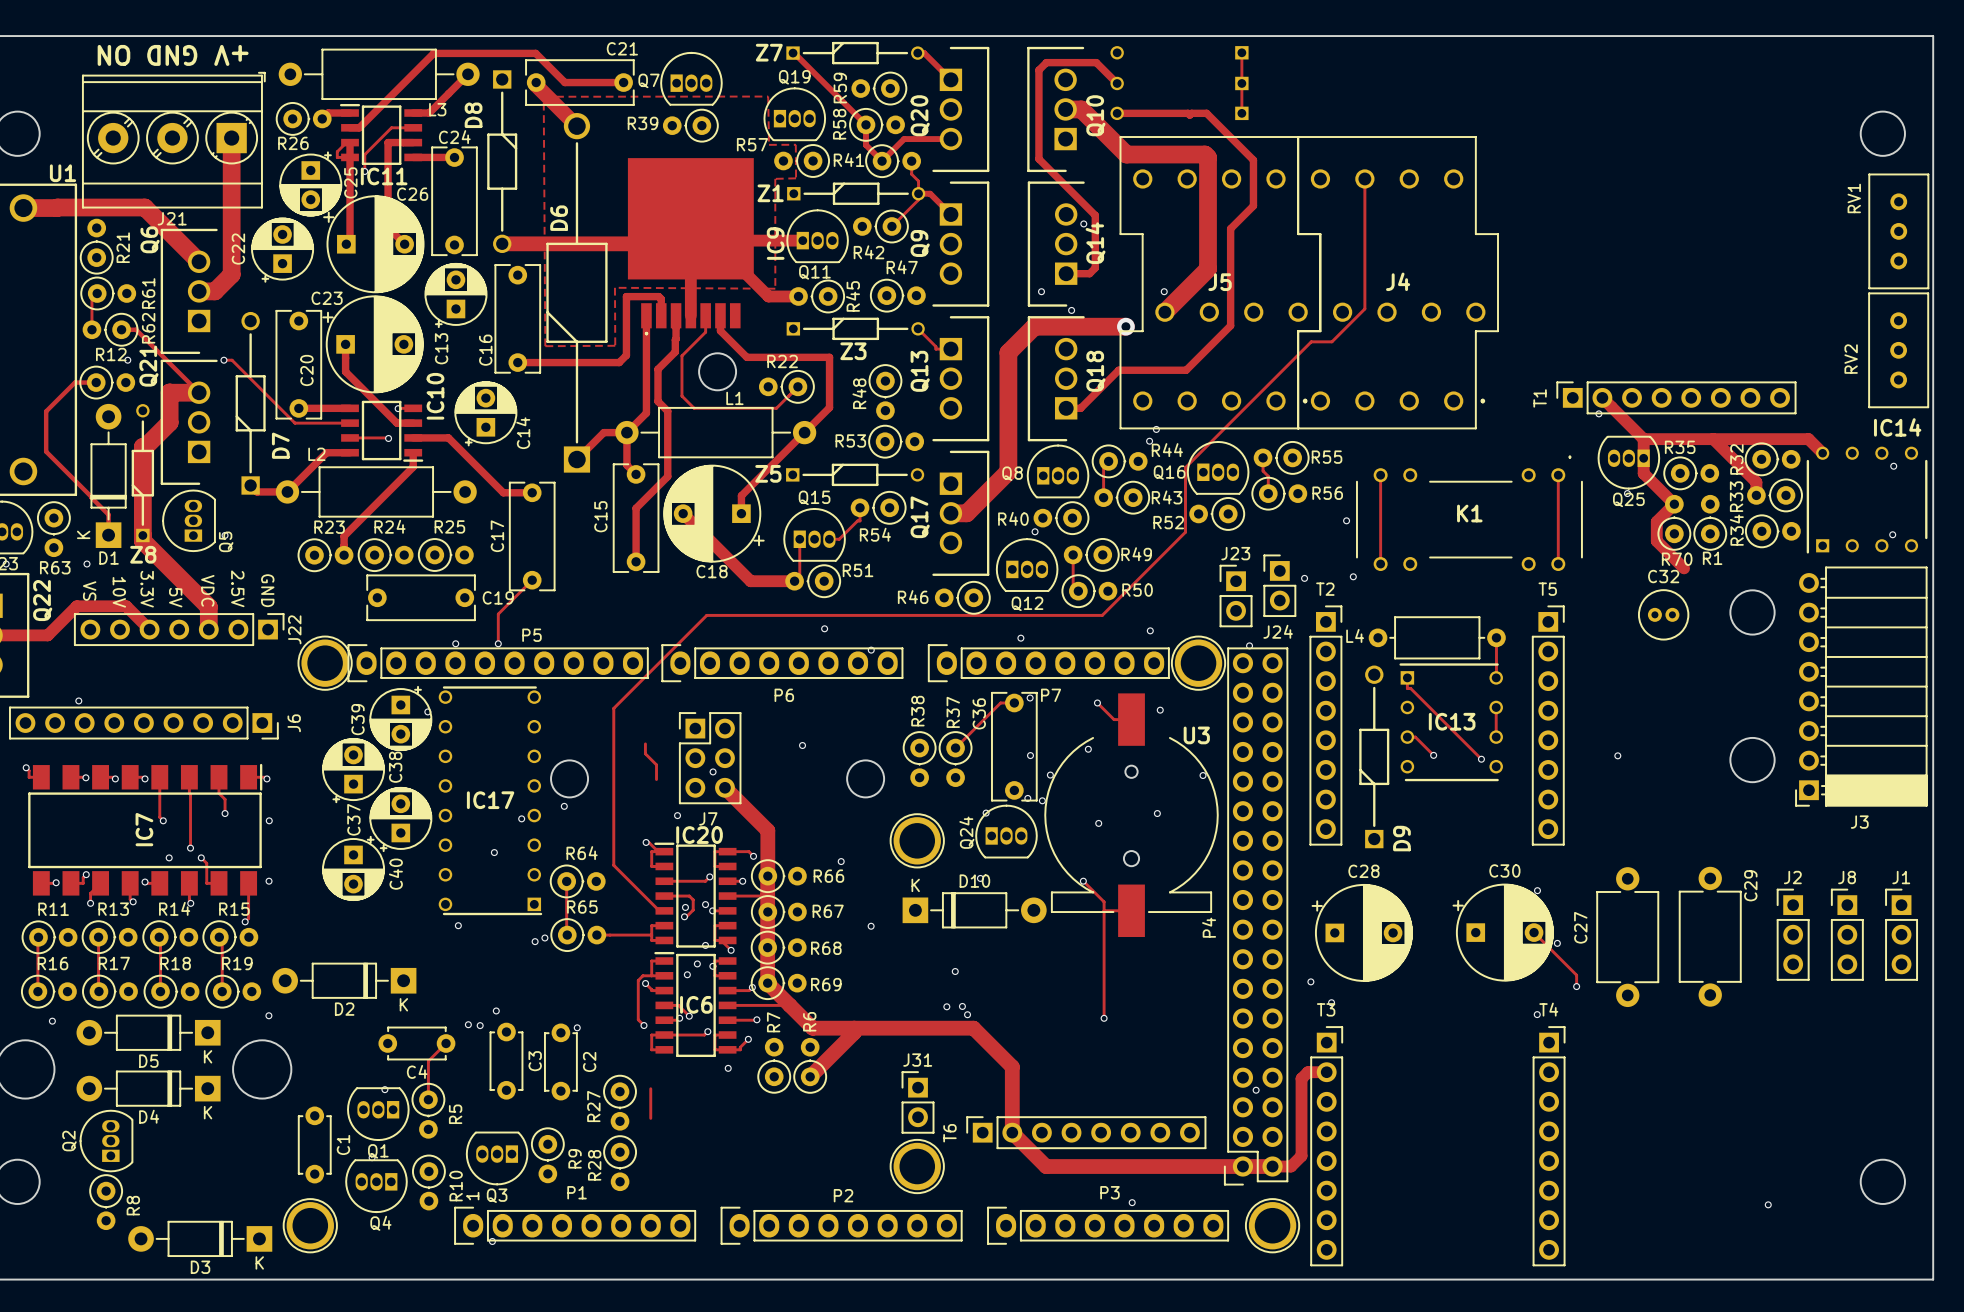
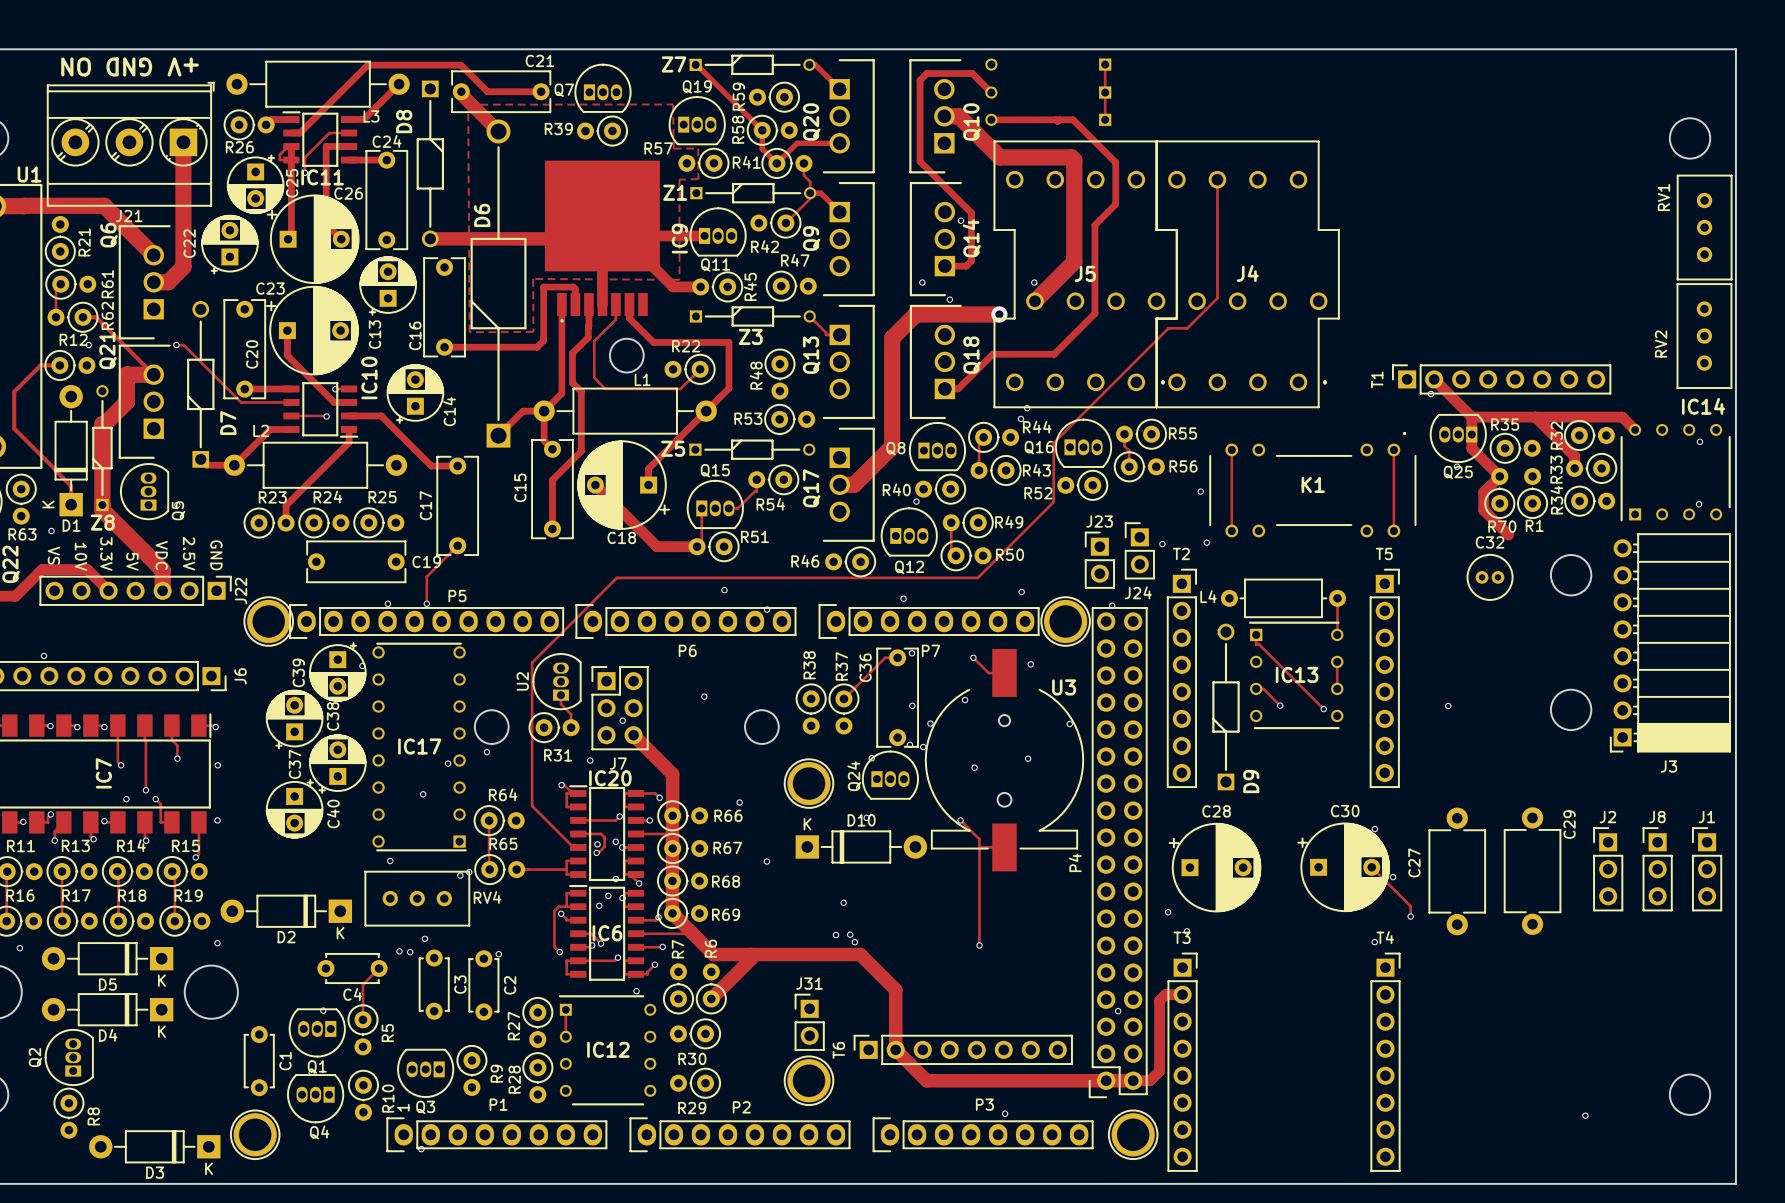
U2: none -> (557, 681)
R31: none -> (554, 727)
RV4: none -> (417, 898)
R30: none -> (695, 1033)
IC12: none -> (607, 1050)
R29: none -> (695, 1083)

